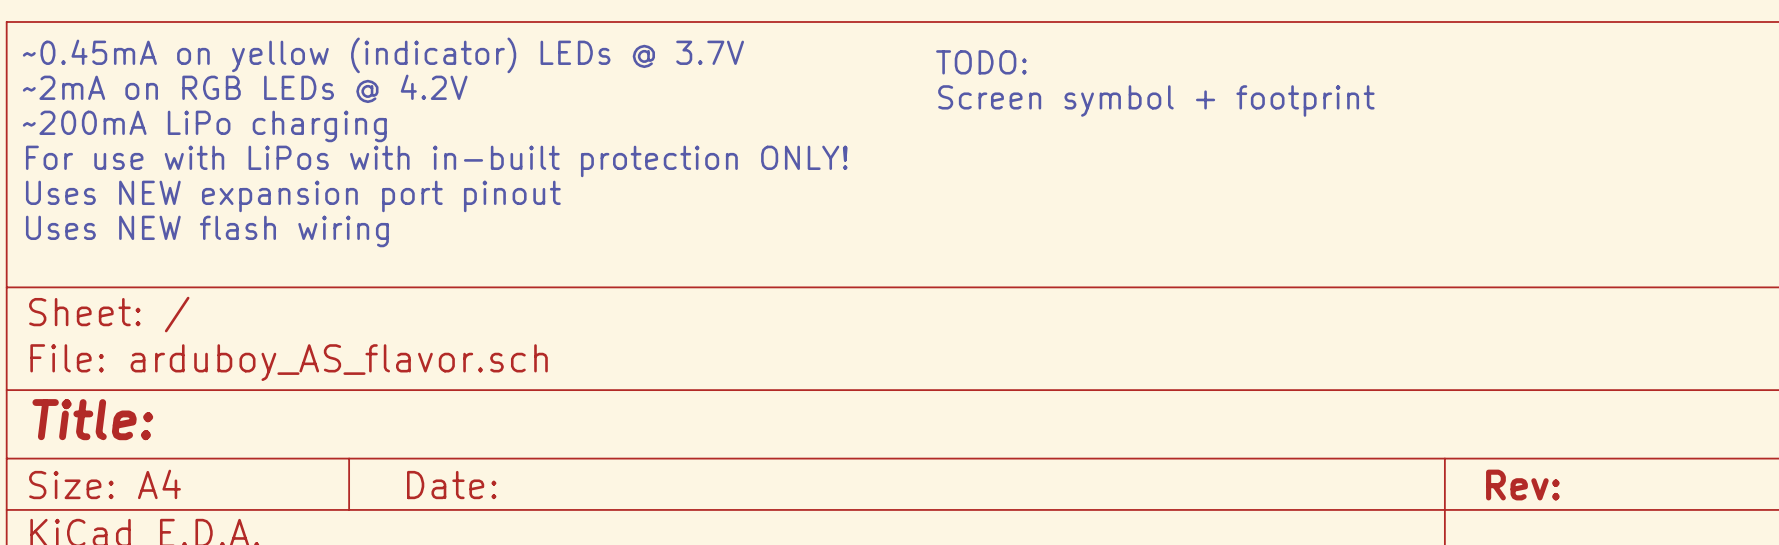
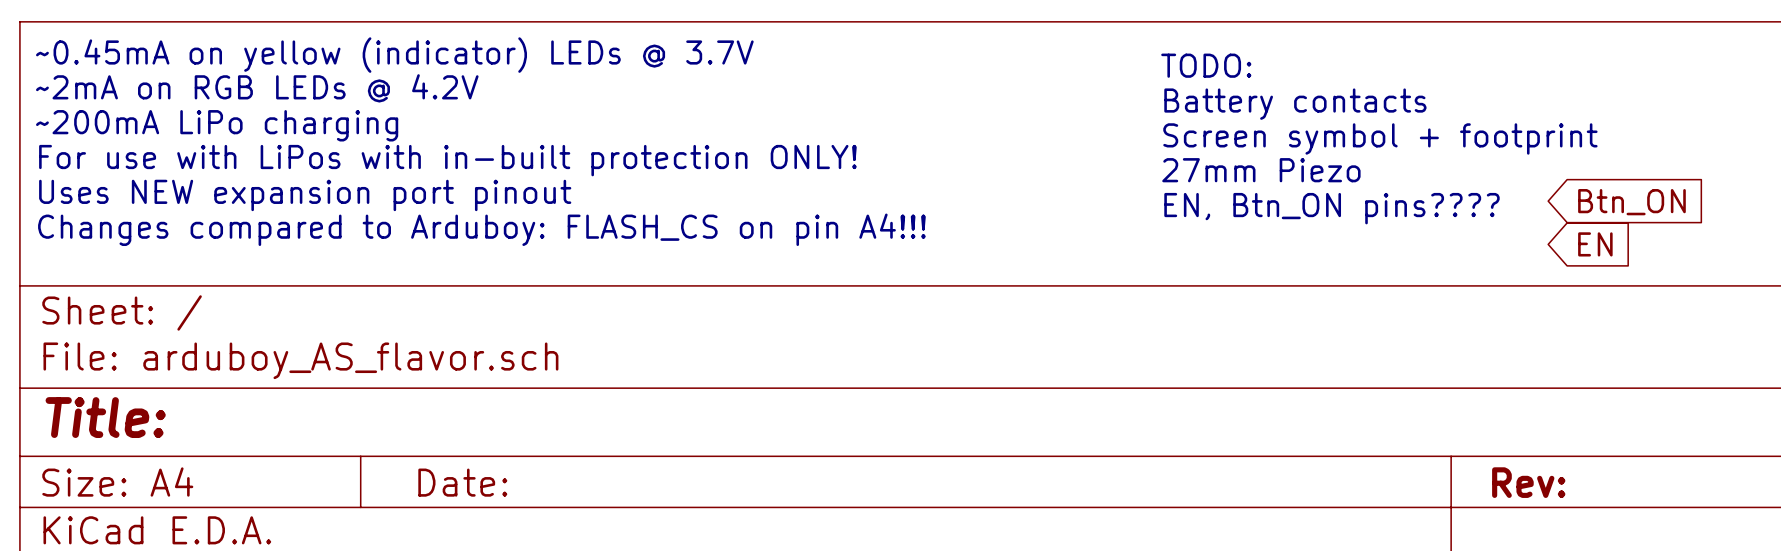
text position: TODO: (981, 62) -> TODO: (1206, 65)
text position: Screen symbol + footprint (1156, 100) -> Screen symbol + footprint (1380, 138)
text: none -> Battery contacts (1295, 104)
text: none -> 27mm Piezo (1261, 170)
global label: none -> Btn_ON (1631, 202)
text: none -> EN, Btn_ON pins???? (1331, 208)
text: Uses NEW flash wiring (207, 231) -> Changes compared to Arduboy: FLASH_CS on pin A4!!! (481, 229)
global label: none -> EN (1595, 244)

